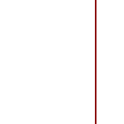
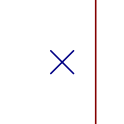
no-connect mark: none -> (62, 62)

